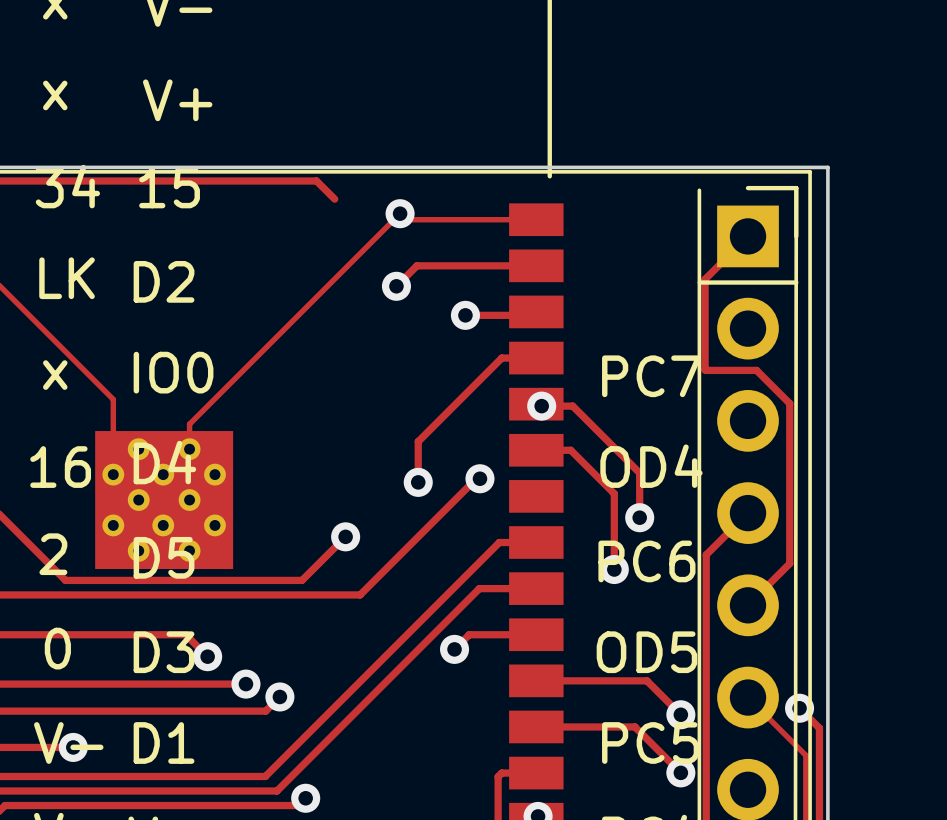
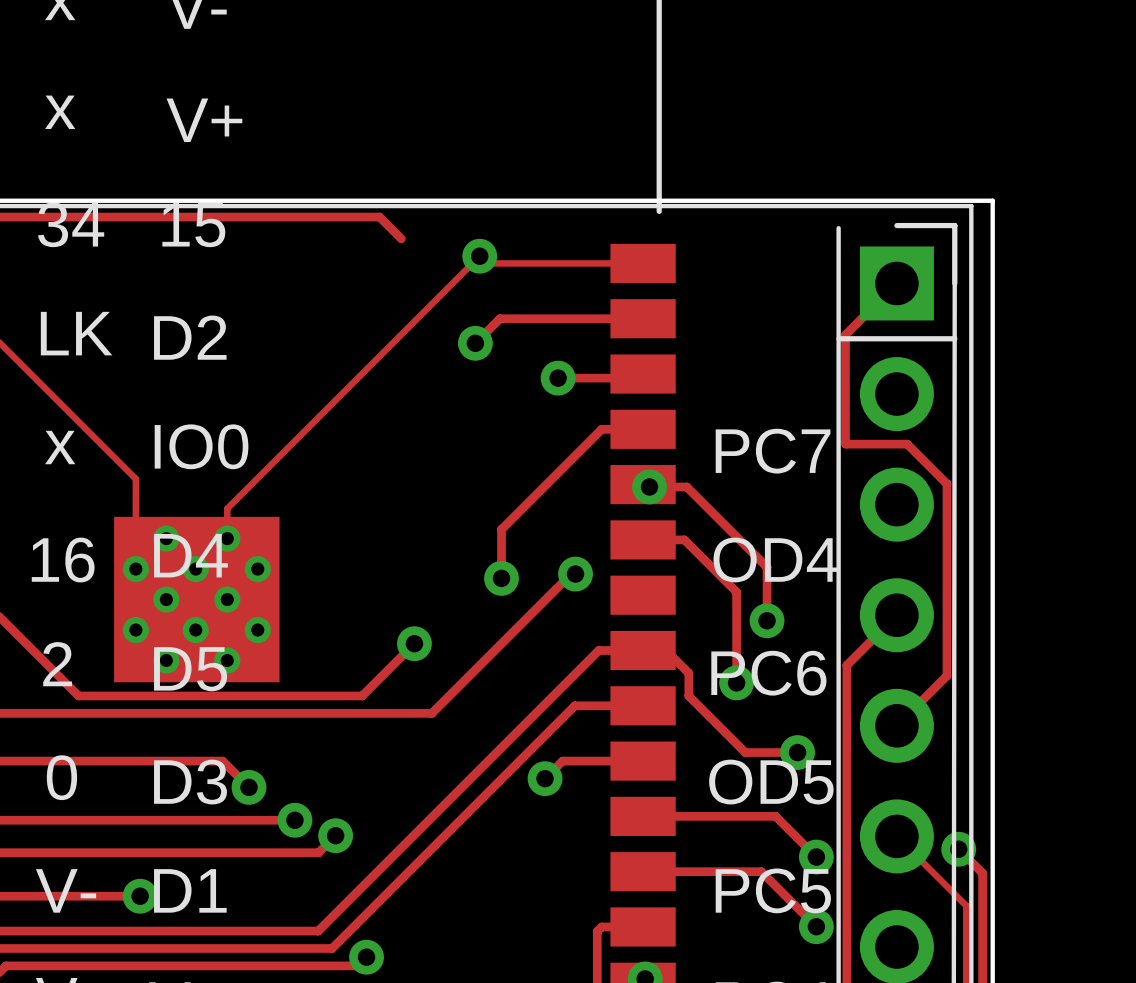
track: none -> (643, 650) (666, 650) (688, 673) (688, 696) (745, 752) (797, 752)
via: none -> (797, 752)
track: none -> (87, 896) (140, 896)
via position: (73, 747) -> (140, 896)

